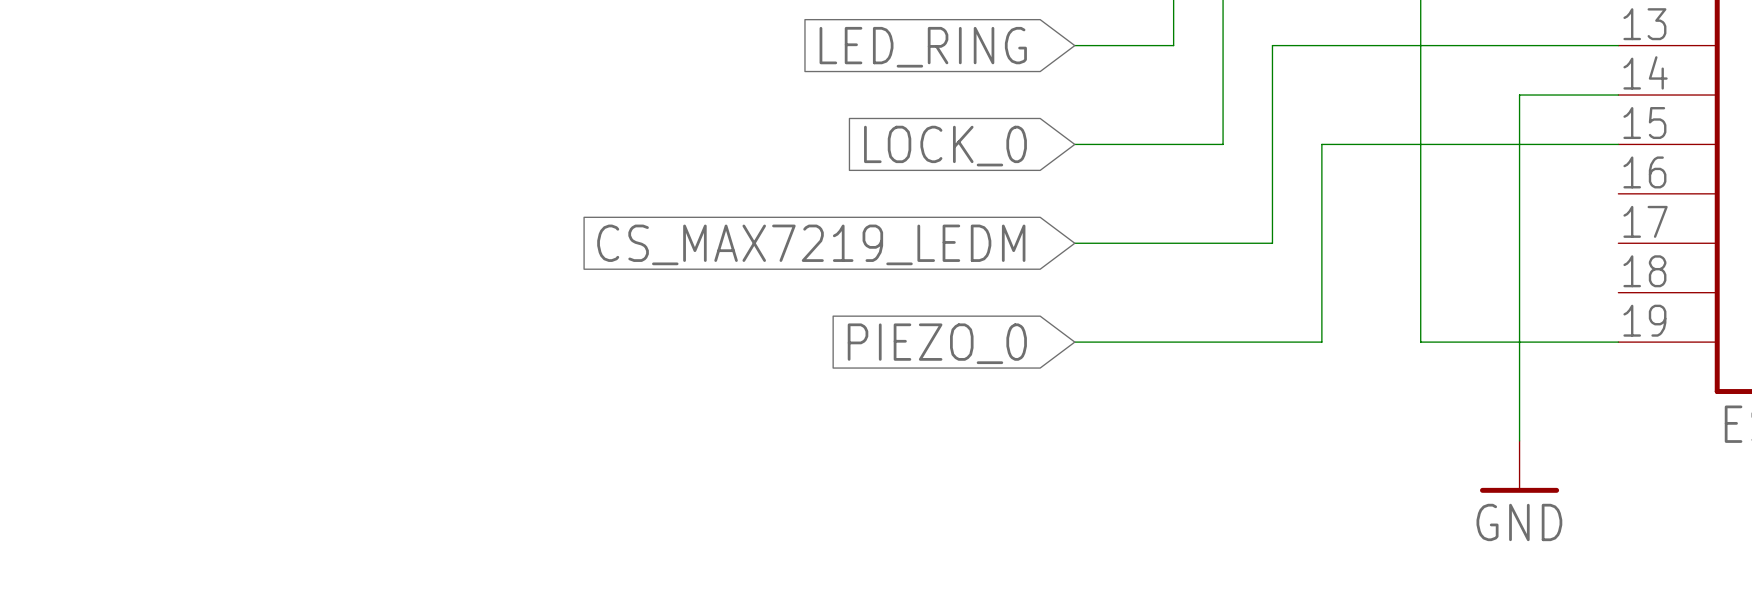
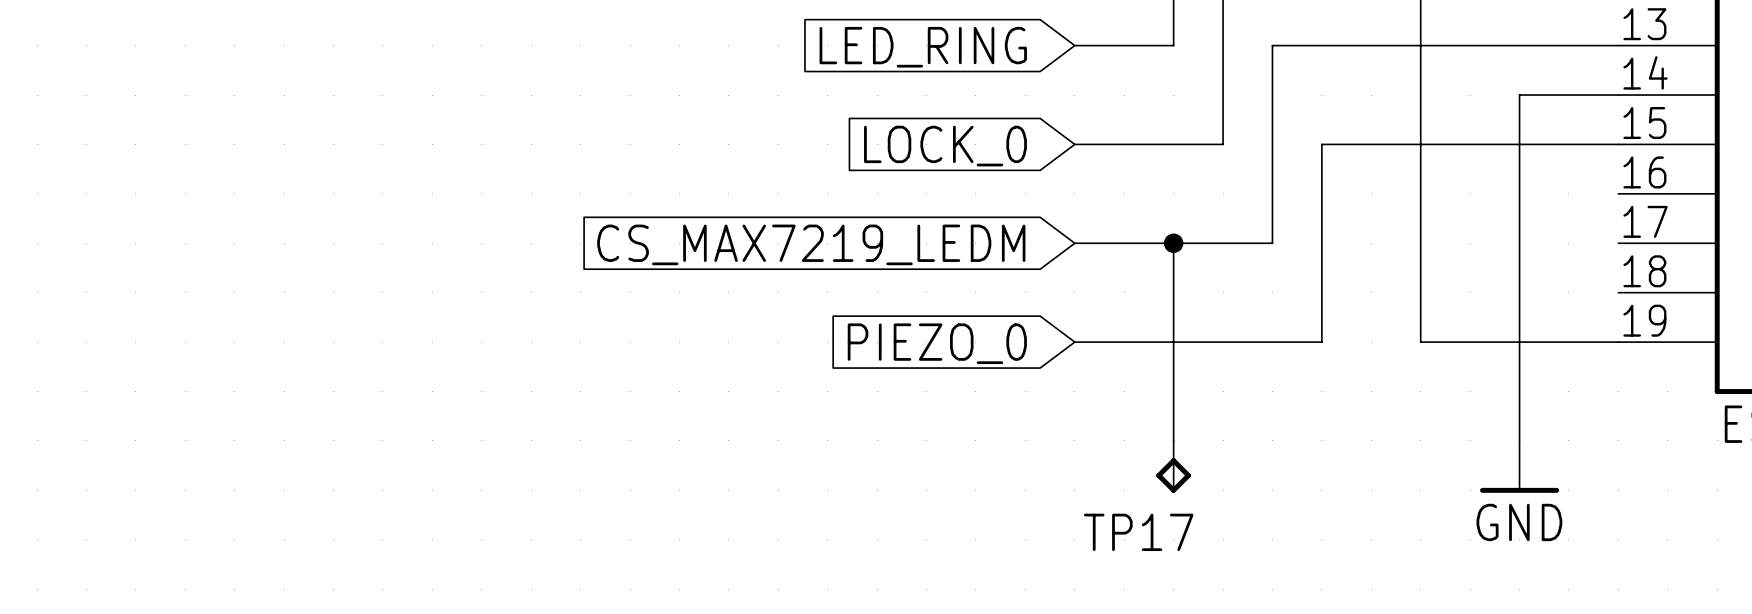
wire: none -> (1173, 243) (1173, 440)
junction: none -> (1173, 243)
TP17: none -> (1173, 466)

